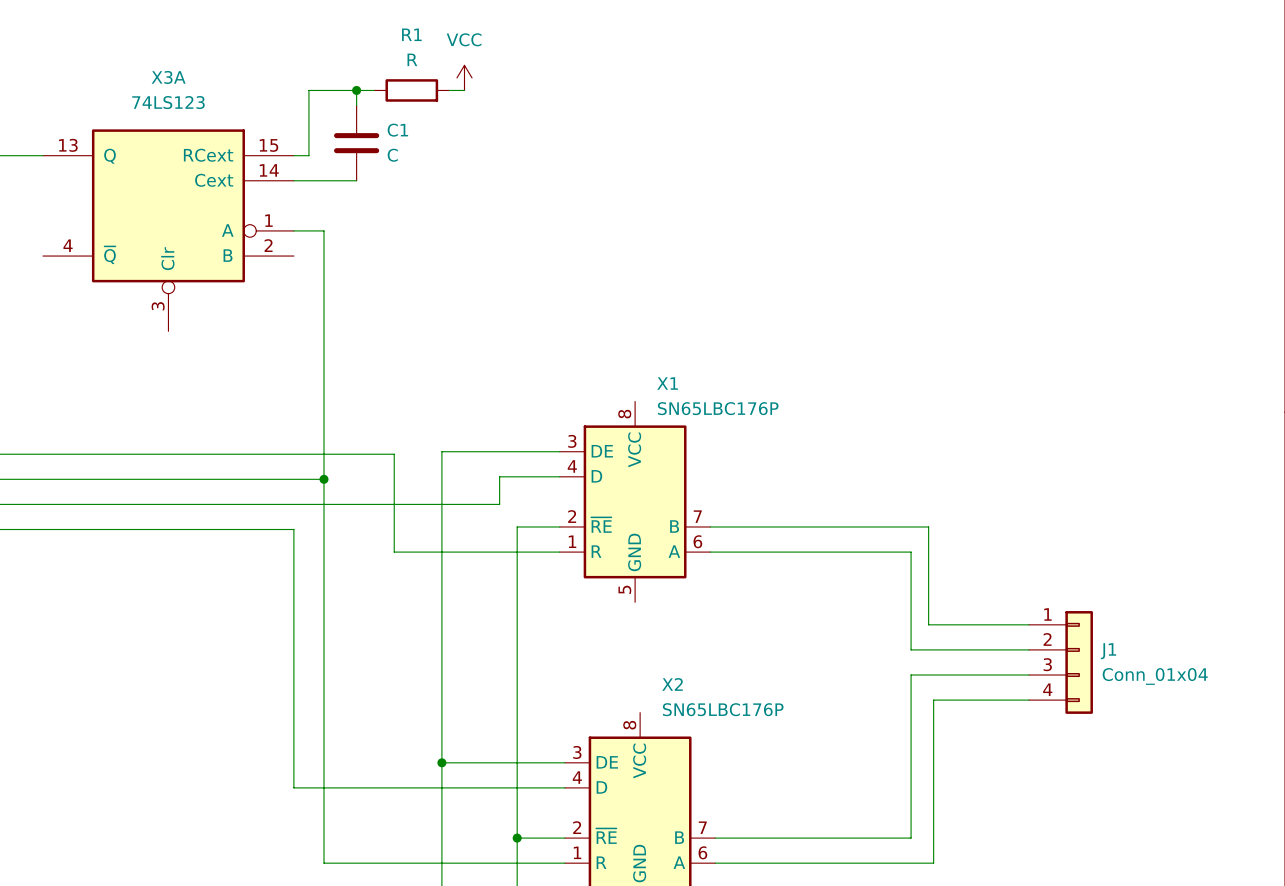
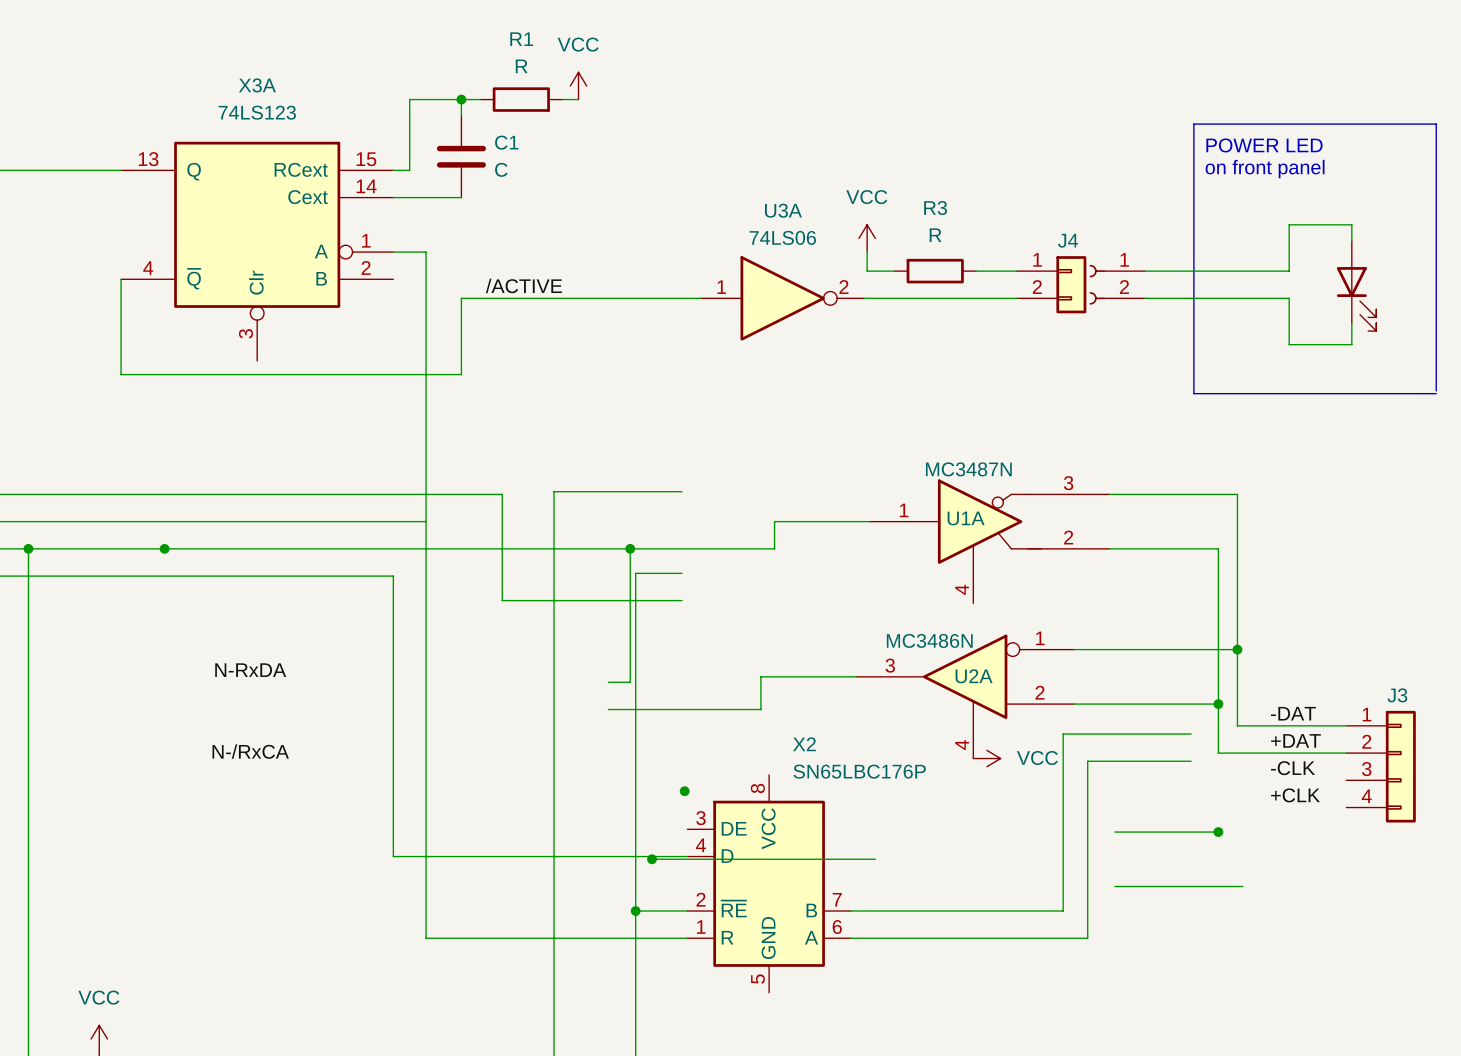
text: none -> POWER LED (1264, 145)
text: none -> on front panel (1265, 169)
power symbol: none -> VCC (867, 238)
wire: none -> (1351, 241) (1351, 224) (1289, 224) (1289, 271) (1144, 271)
wire: none -> (867, 252) (867, 271) (894, 271)
R3: none -> R (935, 271)
wire: none -> (976, 271) (1016, 271)
wire: none -> (121, 279) (121, 374) (461, 374) (461, 298) (701, 298)
J4: none -> (1051, 284)
part: none -> (1117, 284)
part: none -> (1356, 286)
label: none -> /ACTIVE (523, 285)
U3A: none -> 74LS06 (782, 298)
wire: none -> (864, 298) (1016, 298)
wire: none -> (1144, 298) (1289, 298) (1289, 344) (1351, 344) (1351, 322)
line: none -> (1436, 390) (1436, 124) (1193, 124) (1193, 393) (1436, 393)
wire: none -> (1109, 494) (1237, 494) (1237, 725) (1346, 725)
wire: (559, 476) (499, 476) (499, 504) -> (869, 521) (774, 521) (774, 548) (616, 548)
junction: (324, 479) -> none
U1A: none -> MC3487N (989, 541)
X1: SN65LBC176P (635, 501) -> none
junction: none -> (164, 548)
wire: none -> (630, 548) (630, 682) (608, 682)
junction: none -> (630, 548)
wire: none -> (1109, 548) (1218, 548) (1218, 753) (1346, 753)
wire: (710, 526) (928, 526) (928, 624) (1028, 624) -> none
wire: (710, 552) (911, 552) (911, 649) (1028, 649) -> none
wire: none -> (1074, 649) (1237, 649)
junction: none -> (1237, 649)
label: none -> N-RxDA (250, 670)
wire: none -> (856, 676) (760, 676) (760, 709) (608, 709)
U2A: none -> MC3486N (965, 696)
wire: none -> (1074, 704) (1218, 704)
junction: none -> (1218, 704)
label: none -> -DAT (1293, 713)
J1: Conn_01x04 (1060, 662) -> none
label: none -> +DAT (1295, 740)
label: none -> N-/RxCA (250, 751)
power symbol: none -> VCC (986, 758)
J3: none -> (1381, 766)
label: none -> -CLK (1293, 768)
junction: none -> (684, 791)
label: none -> +CLK (1295, 795)
wire: (441, 762) (564, 762) -> none
junction: (441, 762) -> none
wire: none -> (1114, 832) (1218, 832)
junction: none -> (1218, 832)
wire: none -> (652, 859) (875, 859)
junction: none -> (652, 859)
wire: none -> (1114, 886) (1242, 886)

